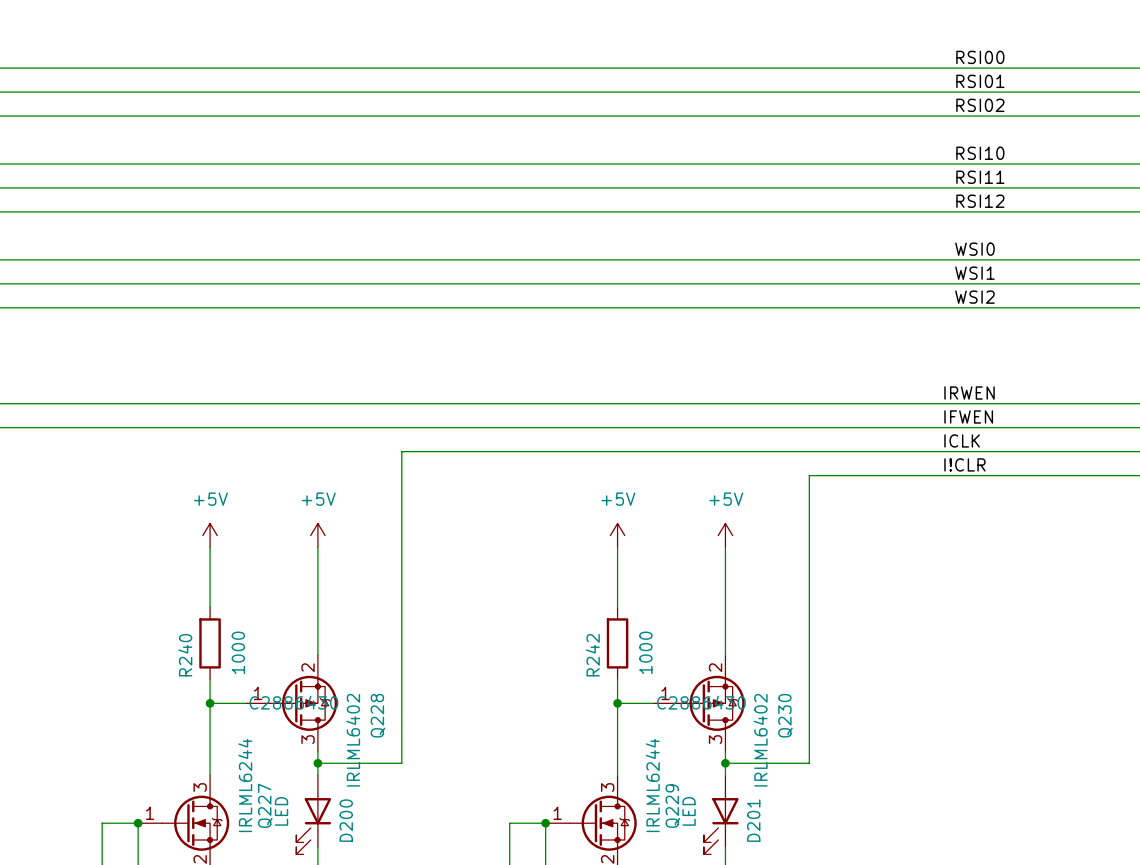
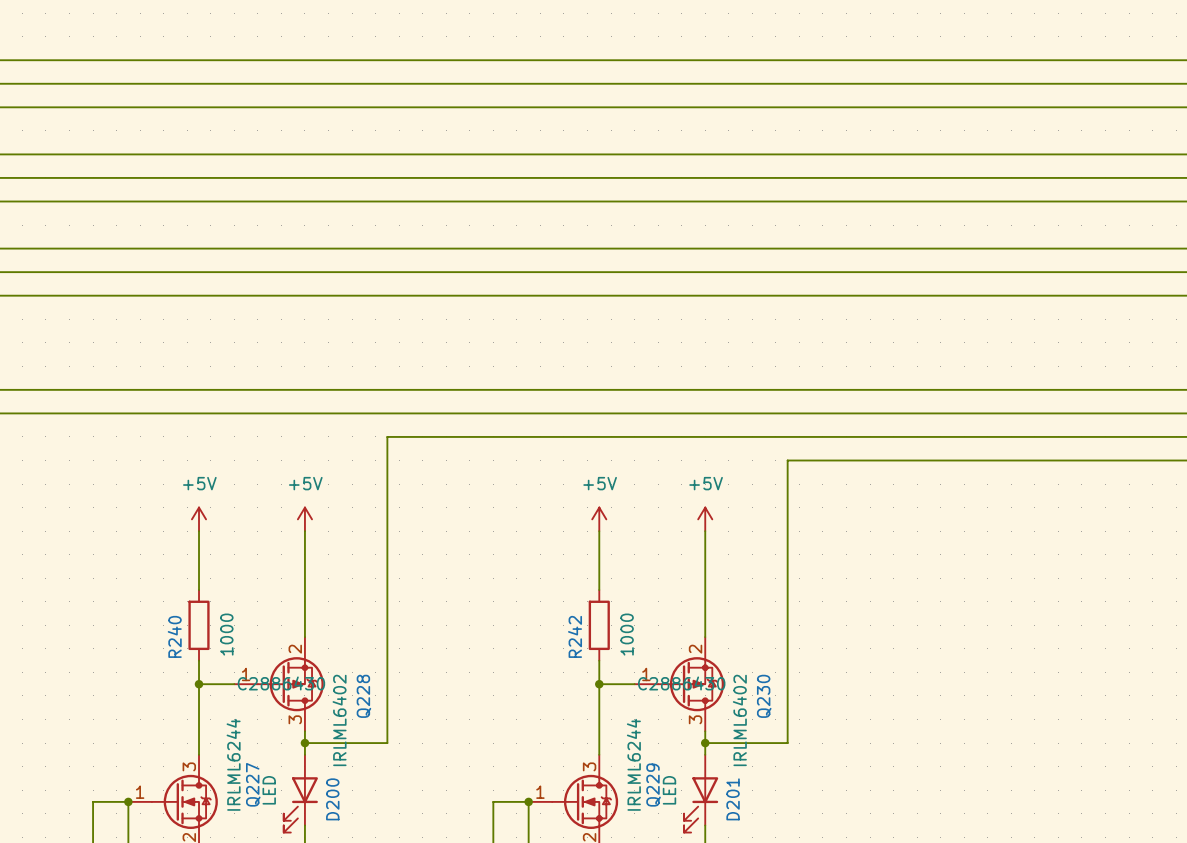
label: RSI00 (980, 57) -> none
label: RSI01 (980, 81) -> none
label: RSI02 (980, 105) -> none
label: RSI10 (980, 153) -> none
label: RSI11 (980, 177) -> none
label: RSI12 (980, 201) -> none
label: WSI0 (974, 249) -> none
label: WSI1 (974, 273) -> none
label: WSI2 (974, 297) -> none
label: IRWEN (969, 393) -> none
label: IFWEN (968, 416) -> none
label: ICLK (962, 440) -> none
label: I!CLR (964, 464) -> none

